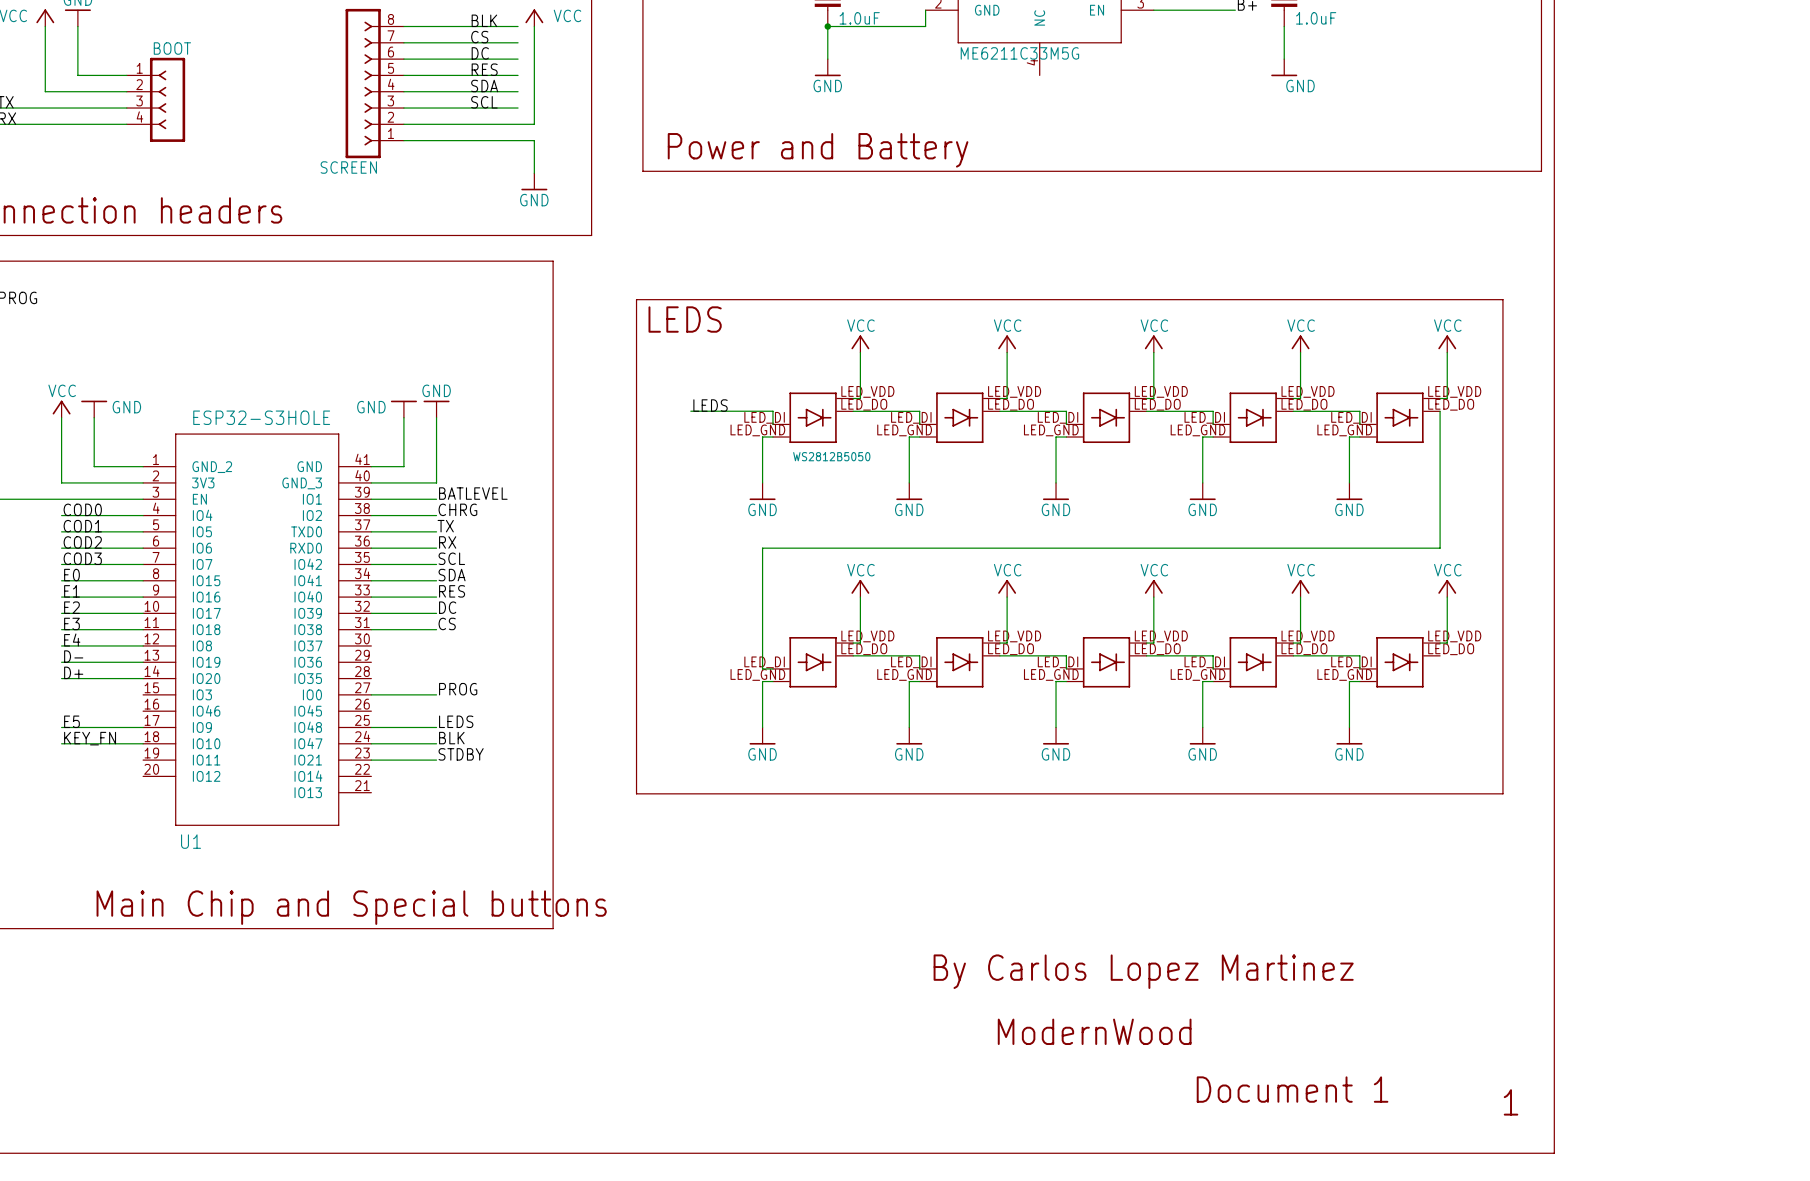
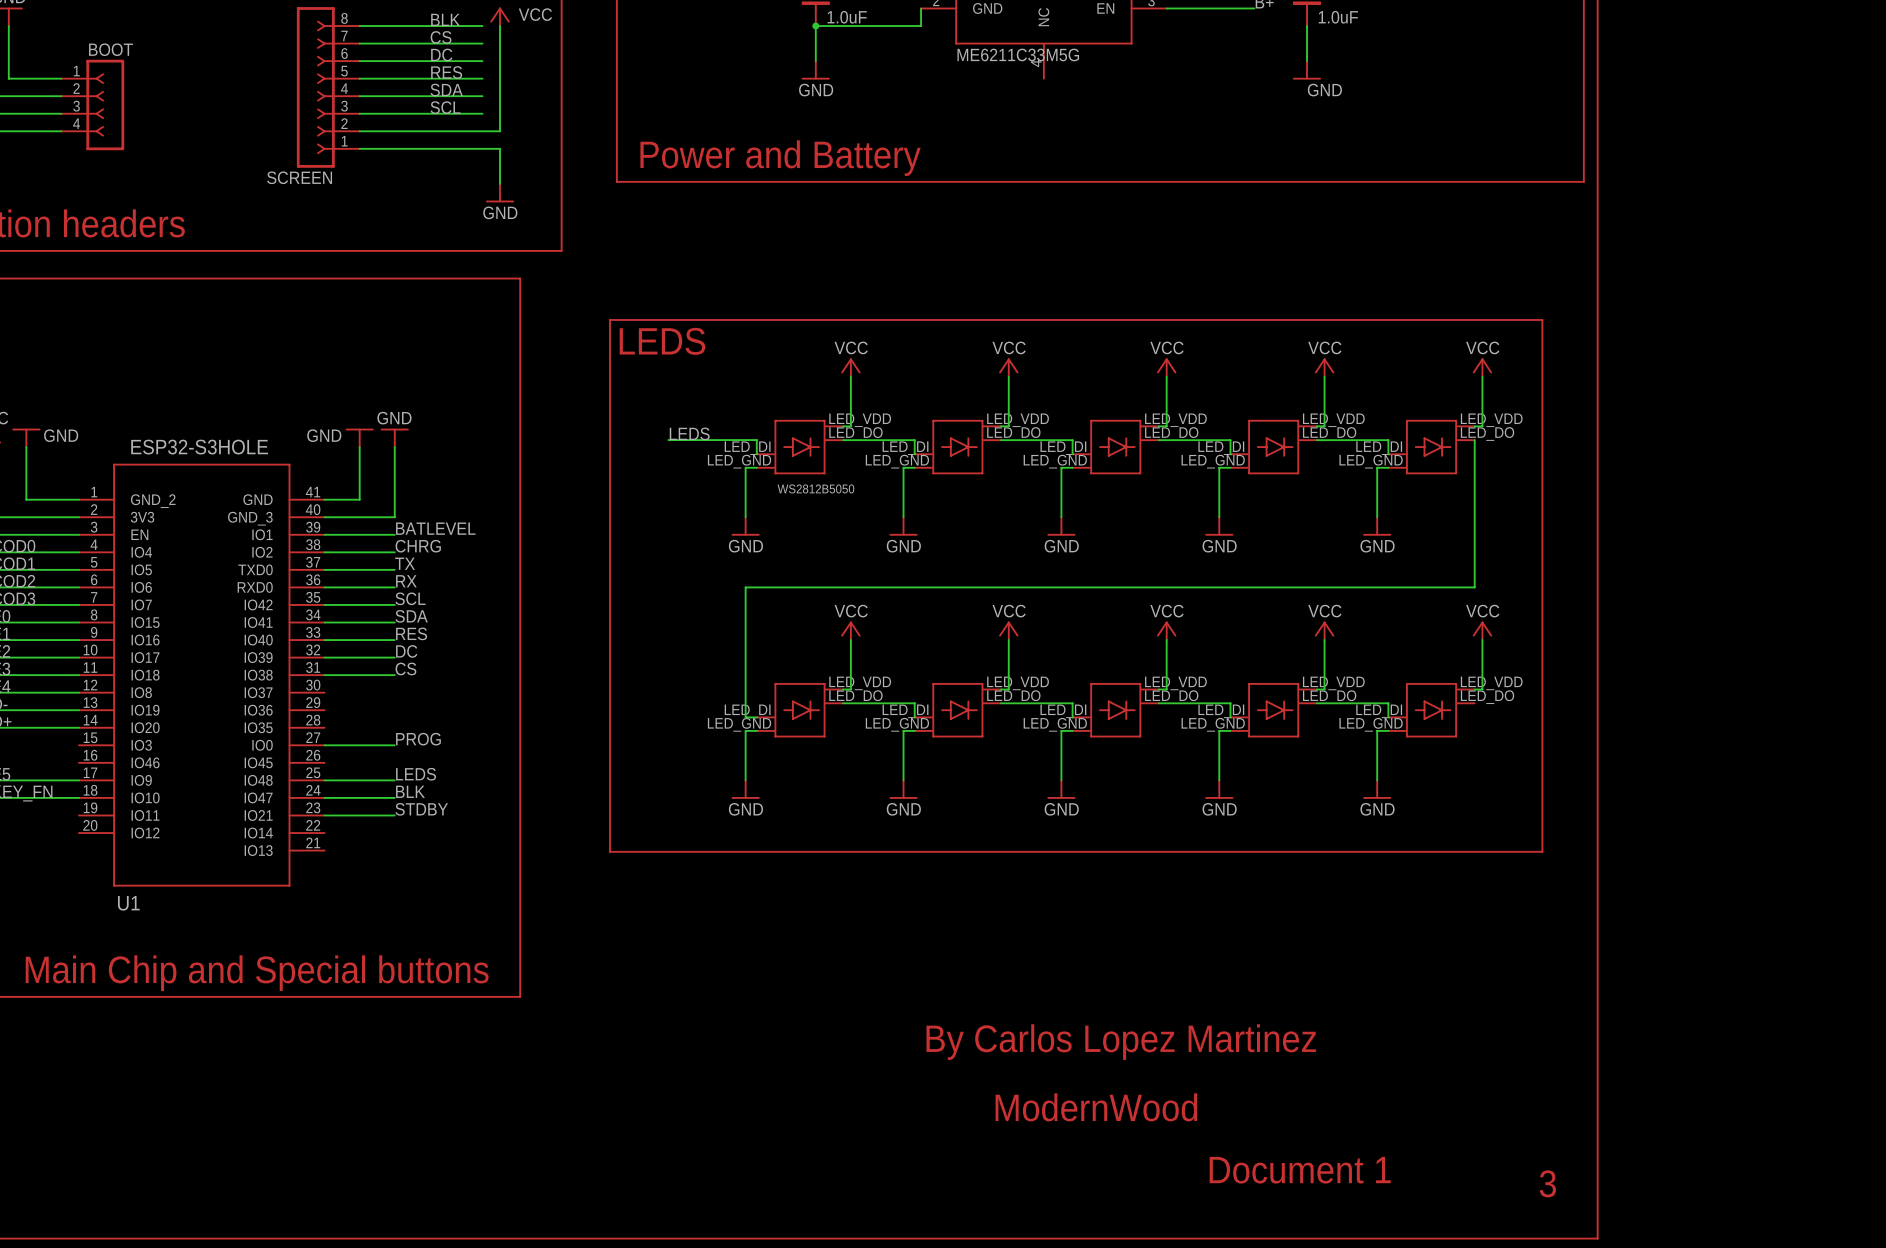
text: 1 (1511, 1102) -> 3 (1547, 1183)

